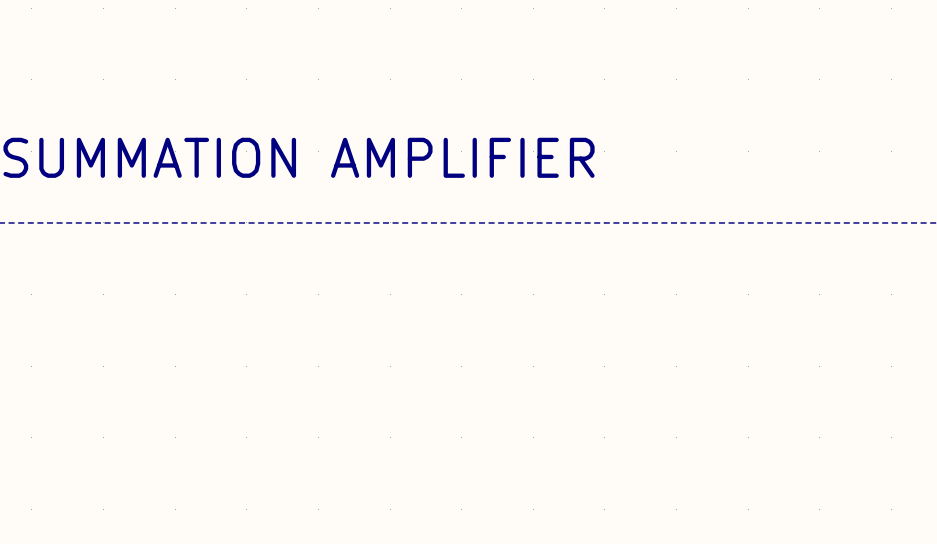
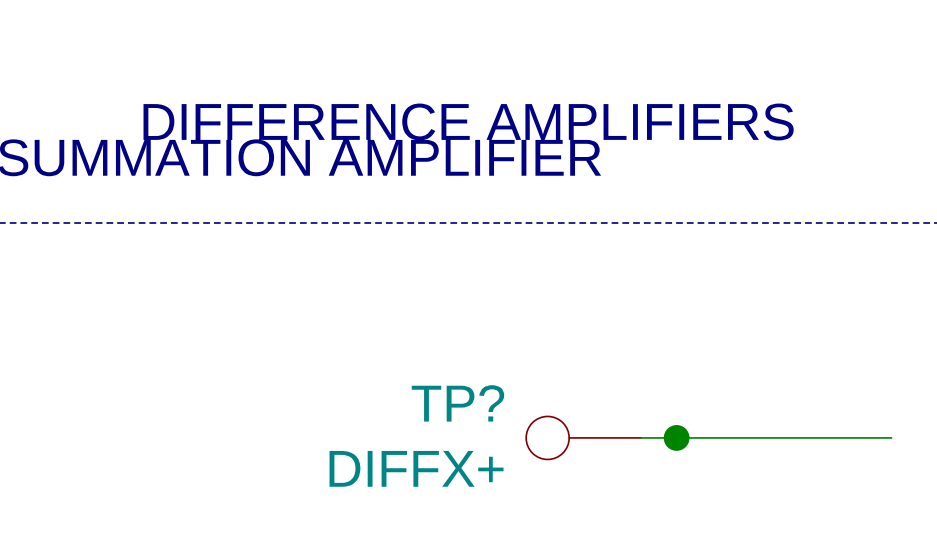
text: none -> DIFFERENCE AMPLIFIERS (468, 121)
TP?: none -> DIFFX+ (583, 437)
wire: none -> (640, 437) (891, 437)
junction: none -> (676, 437)

